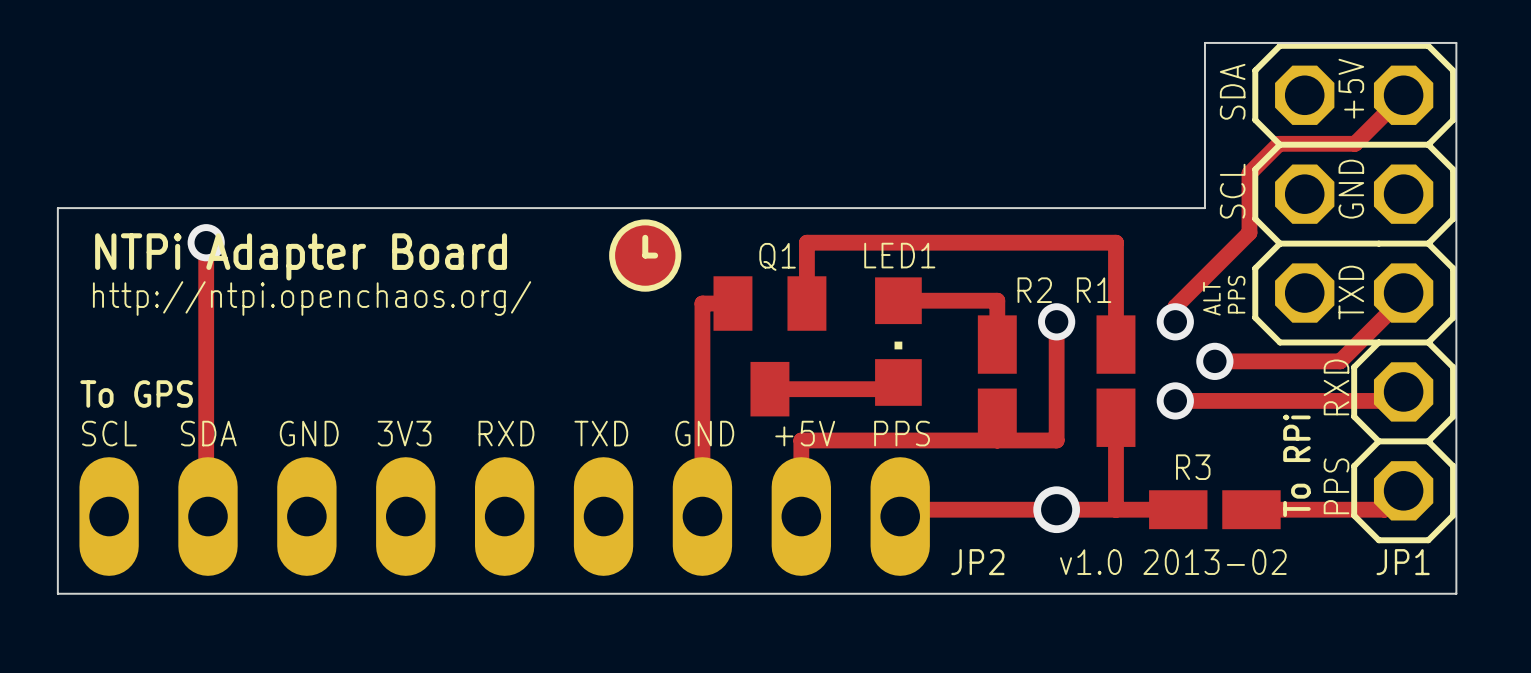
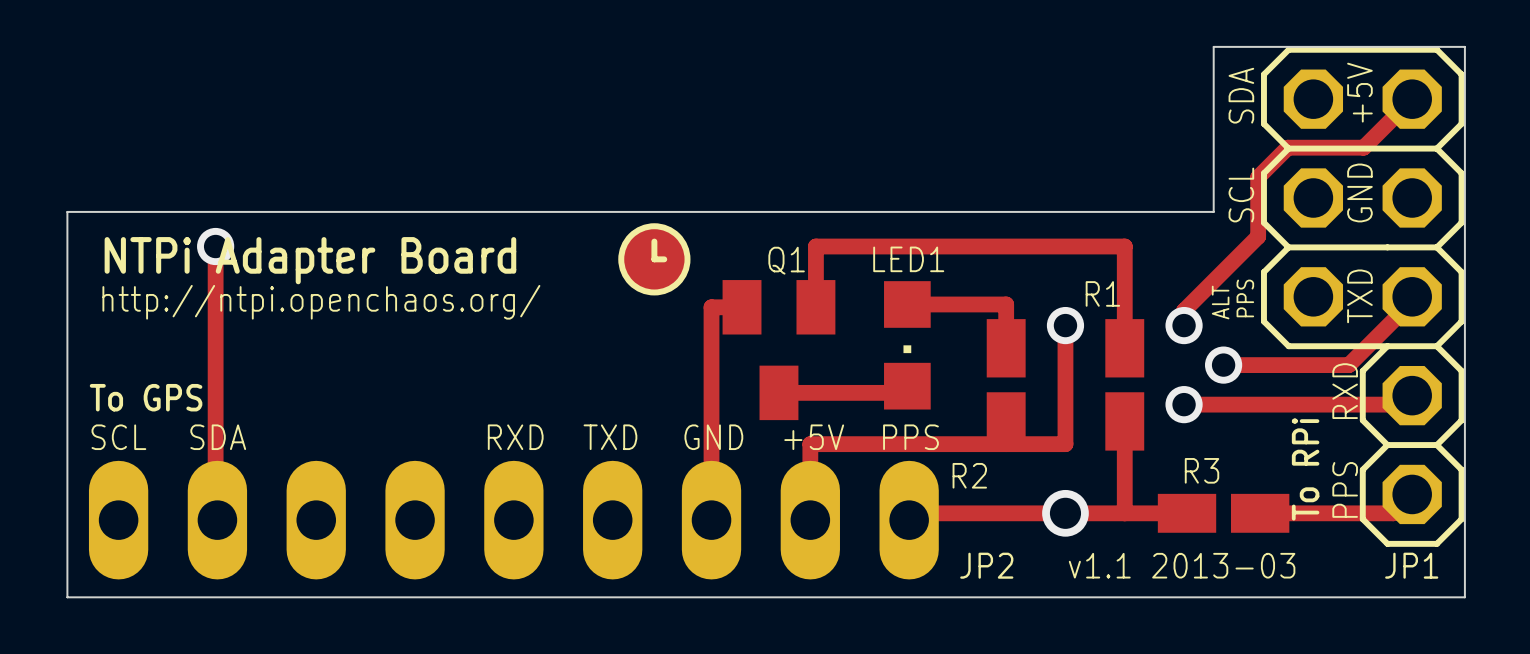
R2 name position: R2 (1034, 290) -> R2 (969, 475)
text: GND (309, 433) -> none
text: 3V3 (404, 433) -> none
text: v1.0 2013-02 (1173, 562) -> v1.1 2013-03 (1182, 565)

